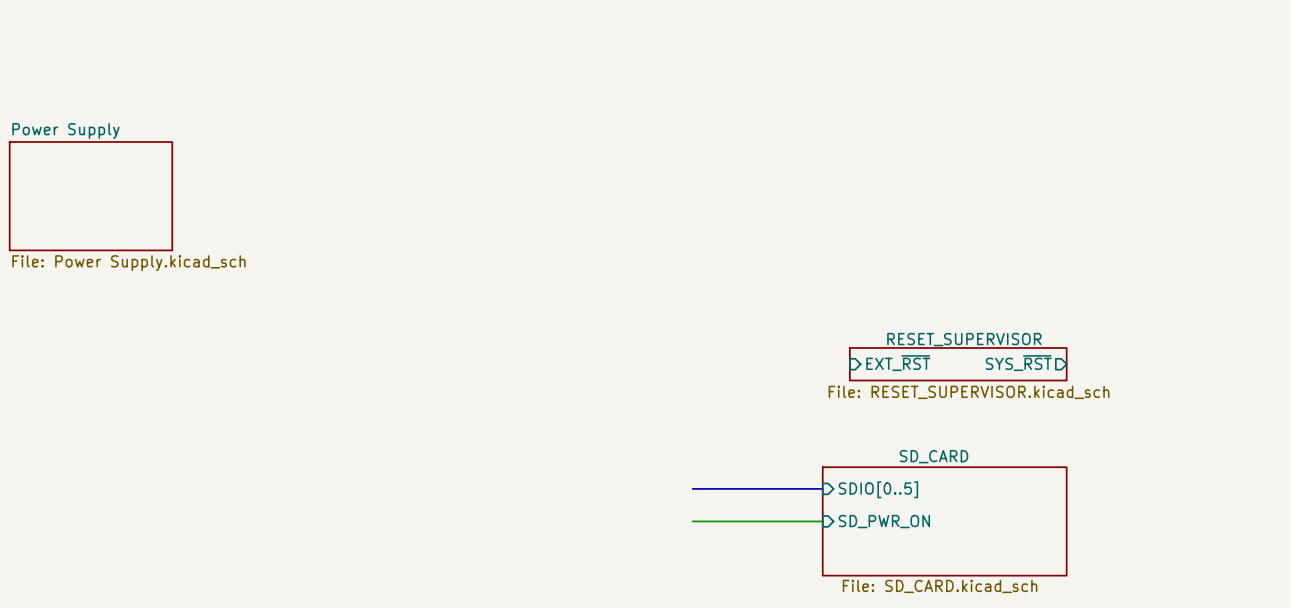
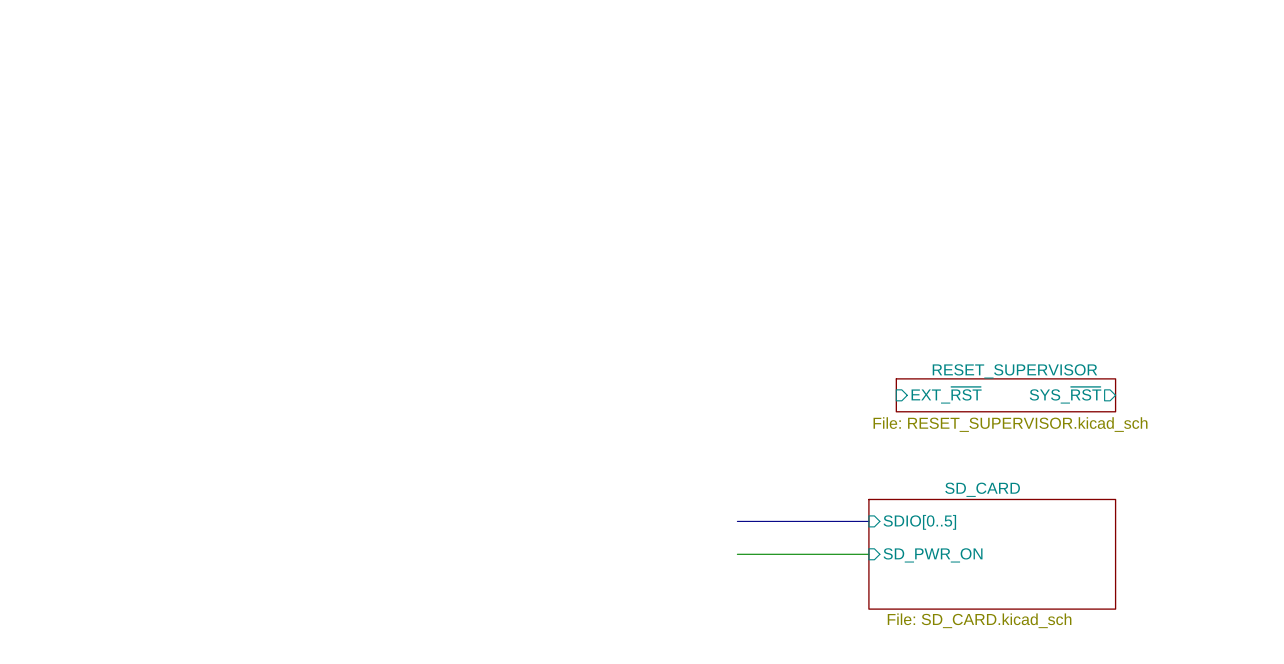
sheet Power Supply: File: Power Supply.kicad_sch (90, 196) -> none

